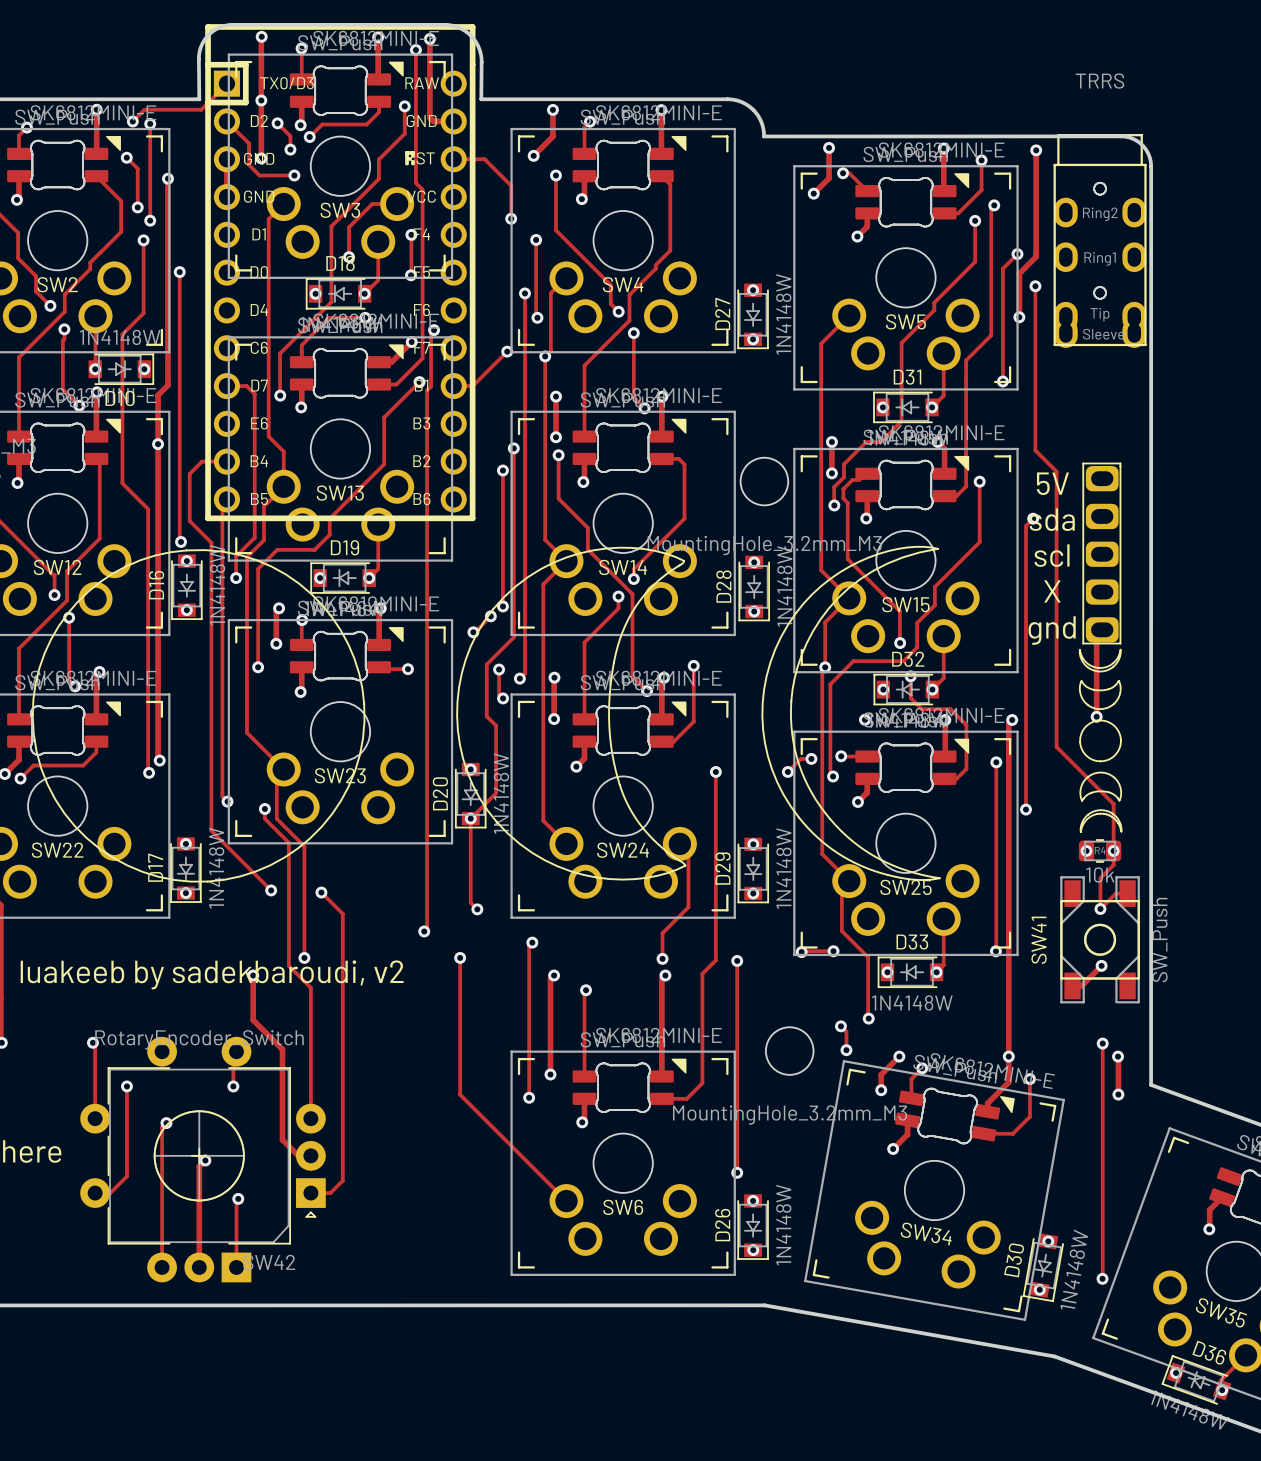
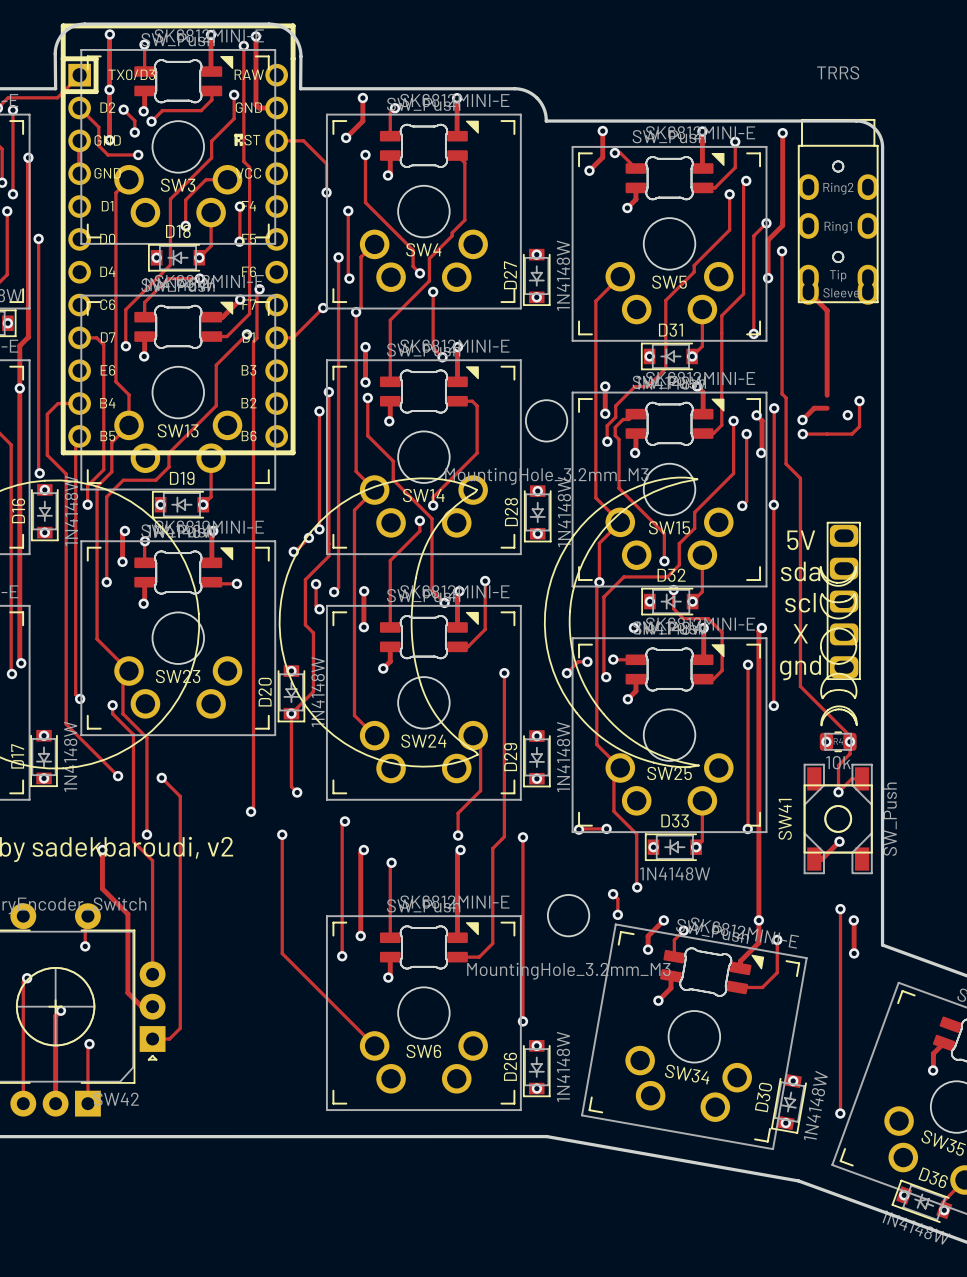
track: none -> (808, 291) (827, 310) (827, 395)
track: (1040, 455) (1056, 471) (1056, 547) -> (786, 397) (786, 463) (800, 478)
track: none -> (859, 400) (859, 426) (852, 434) (802, 434)
via: none -> (859, 400)
via: none -> (774, 408)
track: none -> (827, 408) (814, 408) (802, 419)
track: none -> (756, 415) (762, 420) (761, 452)
via: none -> (756, 415)
via: none -> (847, 415)
via: none -> (802, 419)
text position: 5V (1052, 483) -> 5V (801, 540)
track: none -> (746, 434) (746, 501) (742, 505)
via: none -> (746, 434)
via: none -> (802, 434)
via: none -> (761, 452)
track: (1033, 518) (1025, 525) (1025, 578) -> (774, 408) (773, 504)
via: (1033, 518) -> none
text position: sda (1052, 519) -> sda (800, 571)
part position: (1101, 553) -> (843, 600)
text position: scl (1052, 555) -> scl (800, 602)
via: none -> (773, 504)
via: none -> (742, 505)
text position: X (1052, 591) -> X (800, 633)
track: (1102, 629) (1096, 635) (1096, 716) -> none
text position: gnd (1052, 630) -> gnd (800, 667)
via: (1096, 716) -> none
track: (1056, 747) (1113, 804) (1113, 844) -> (800, 651) (800, 686) (850, 736)

